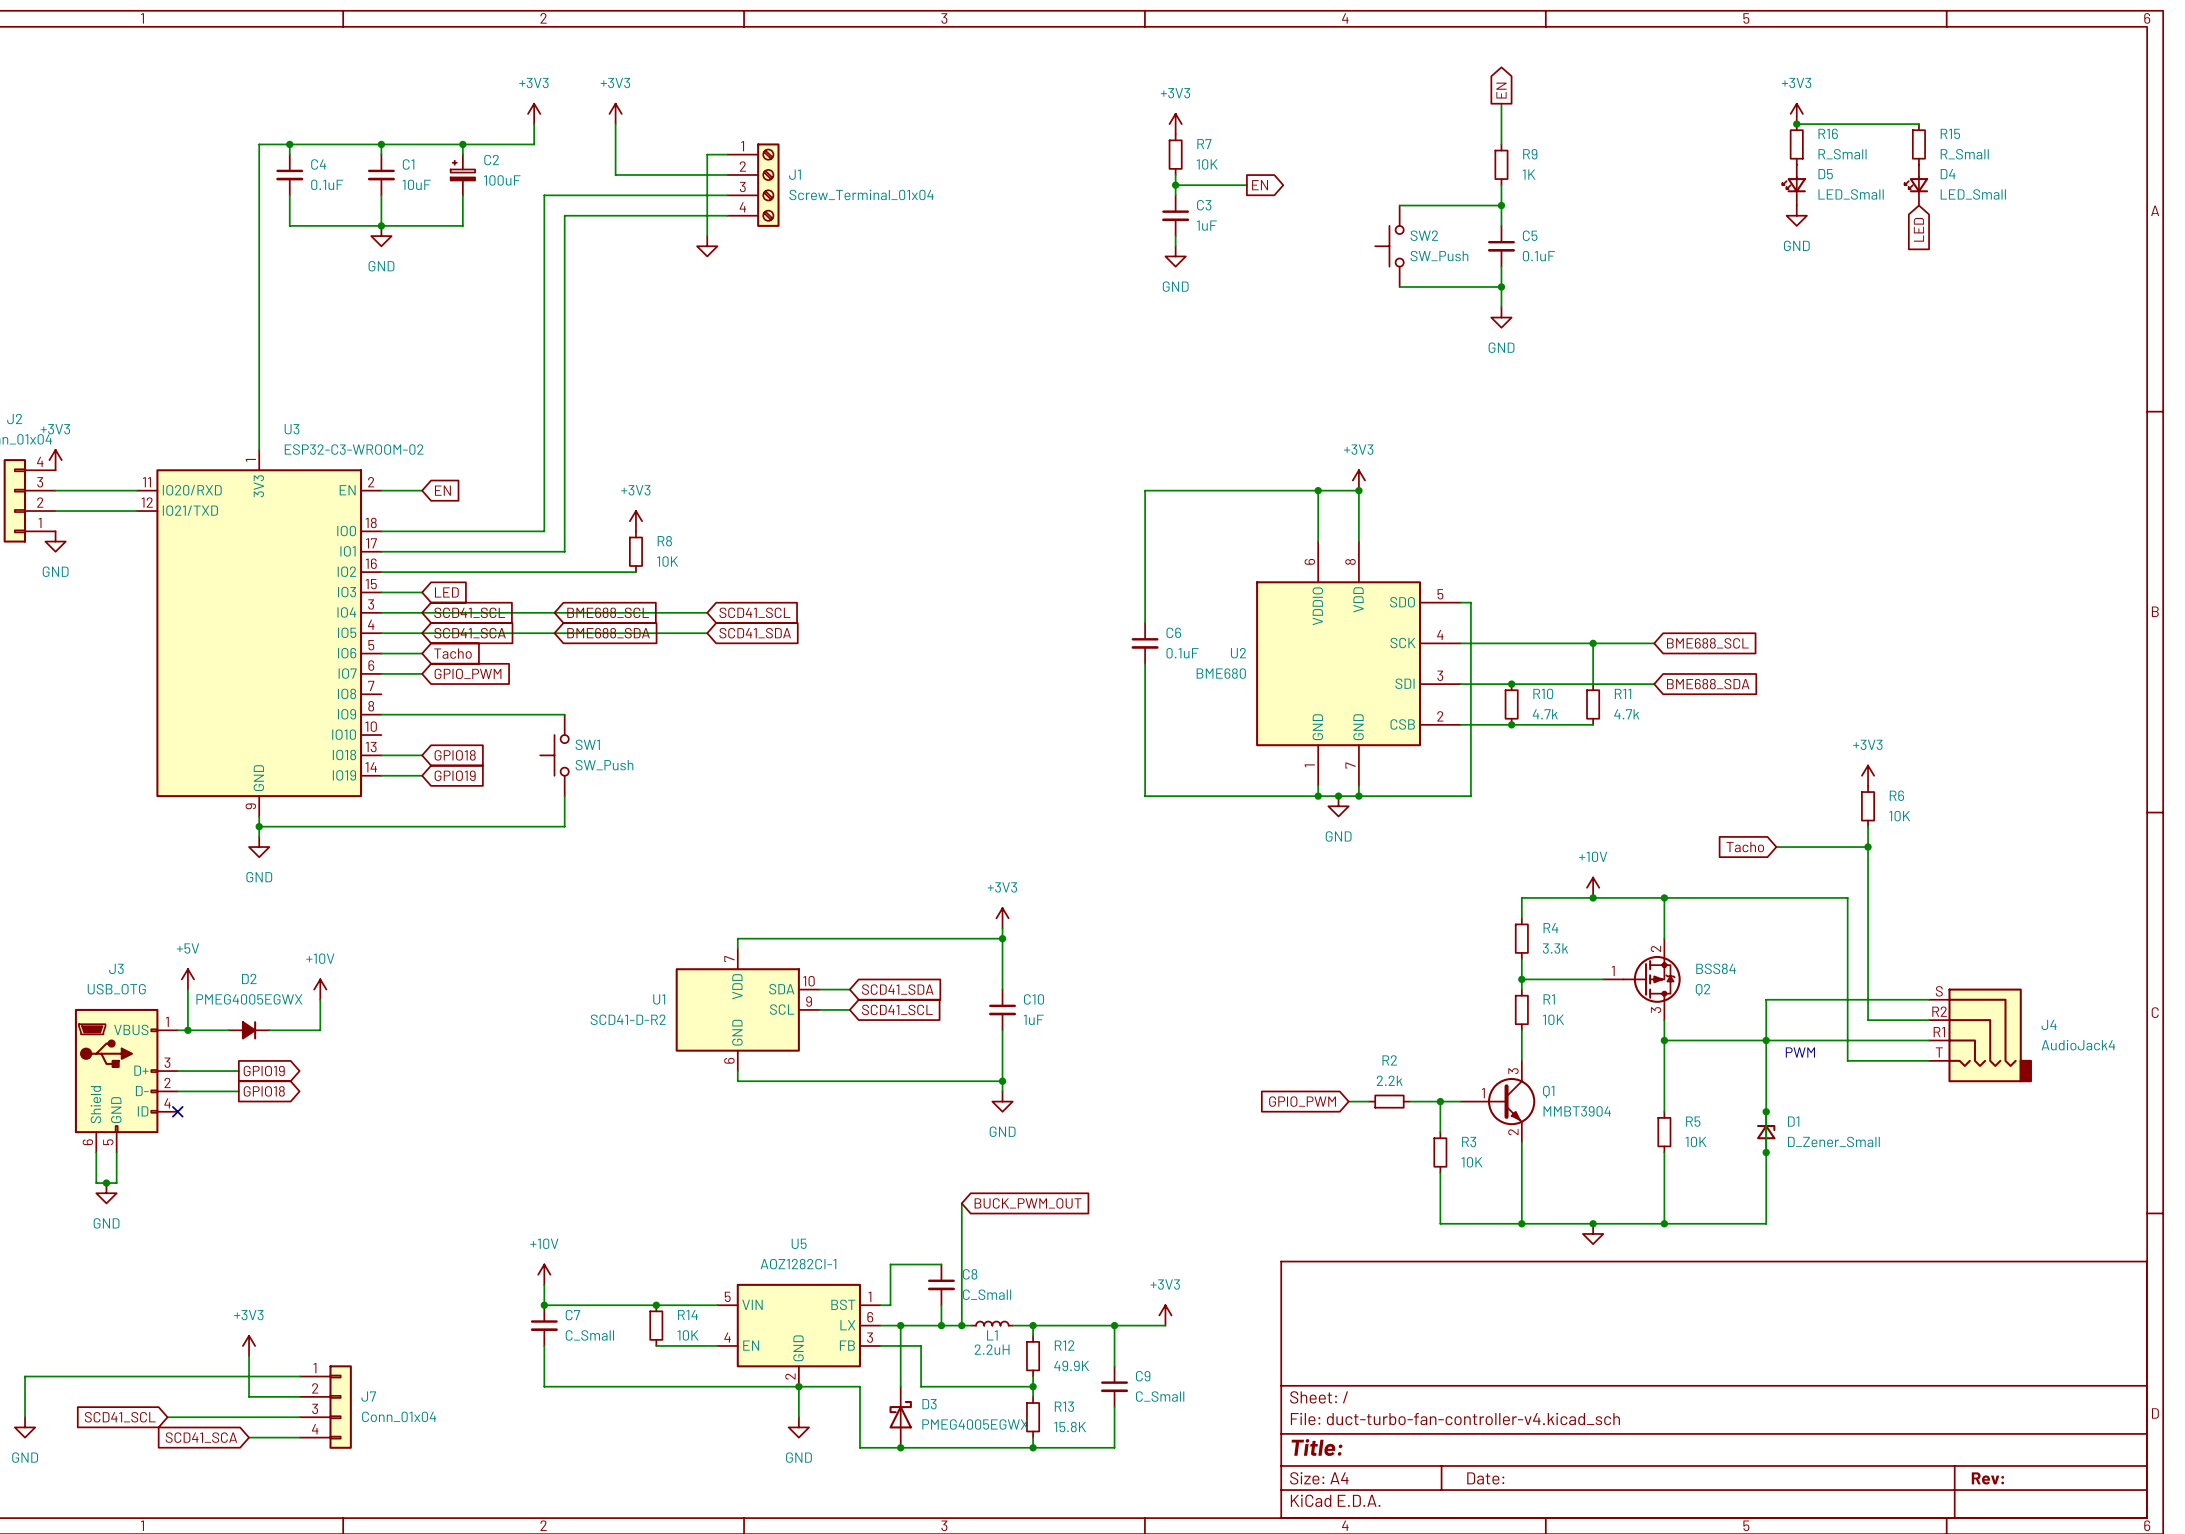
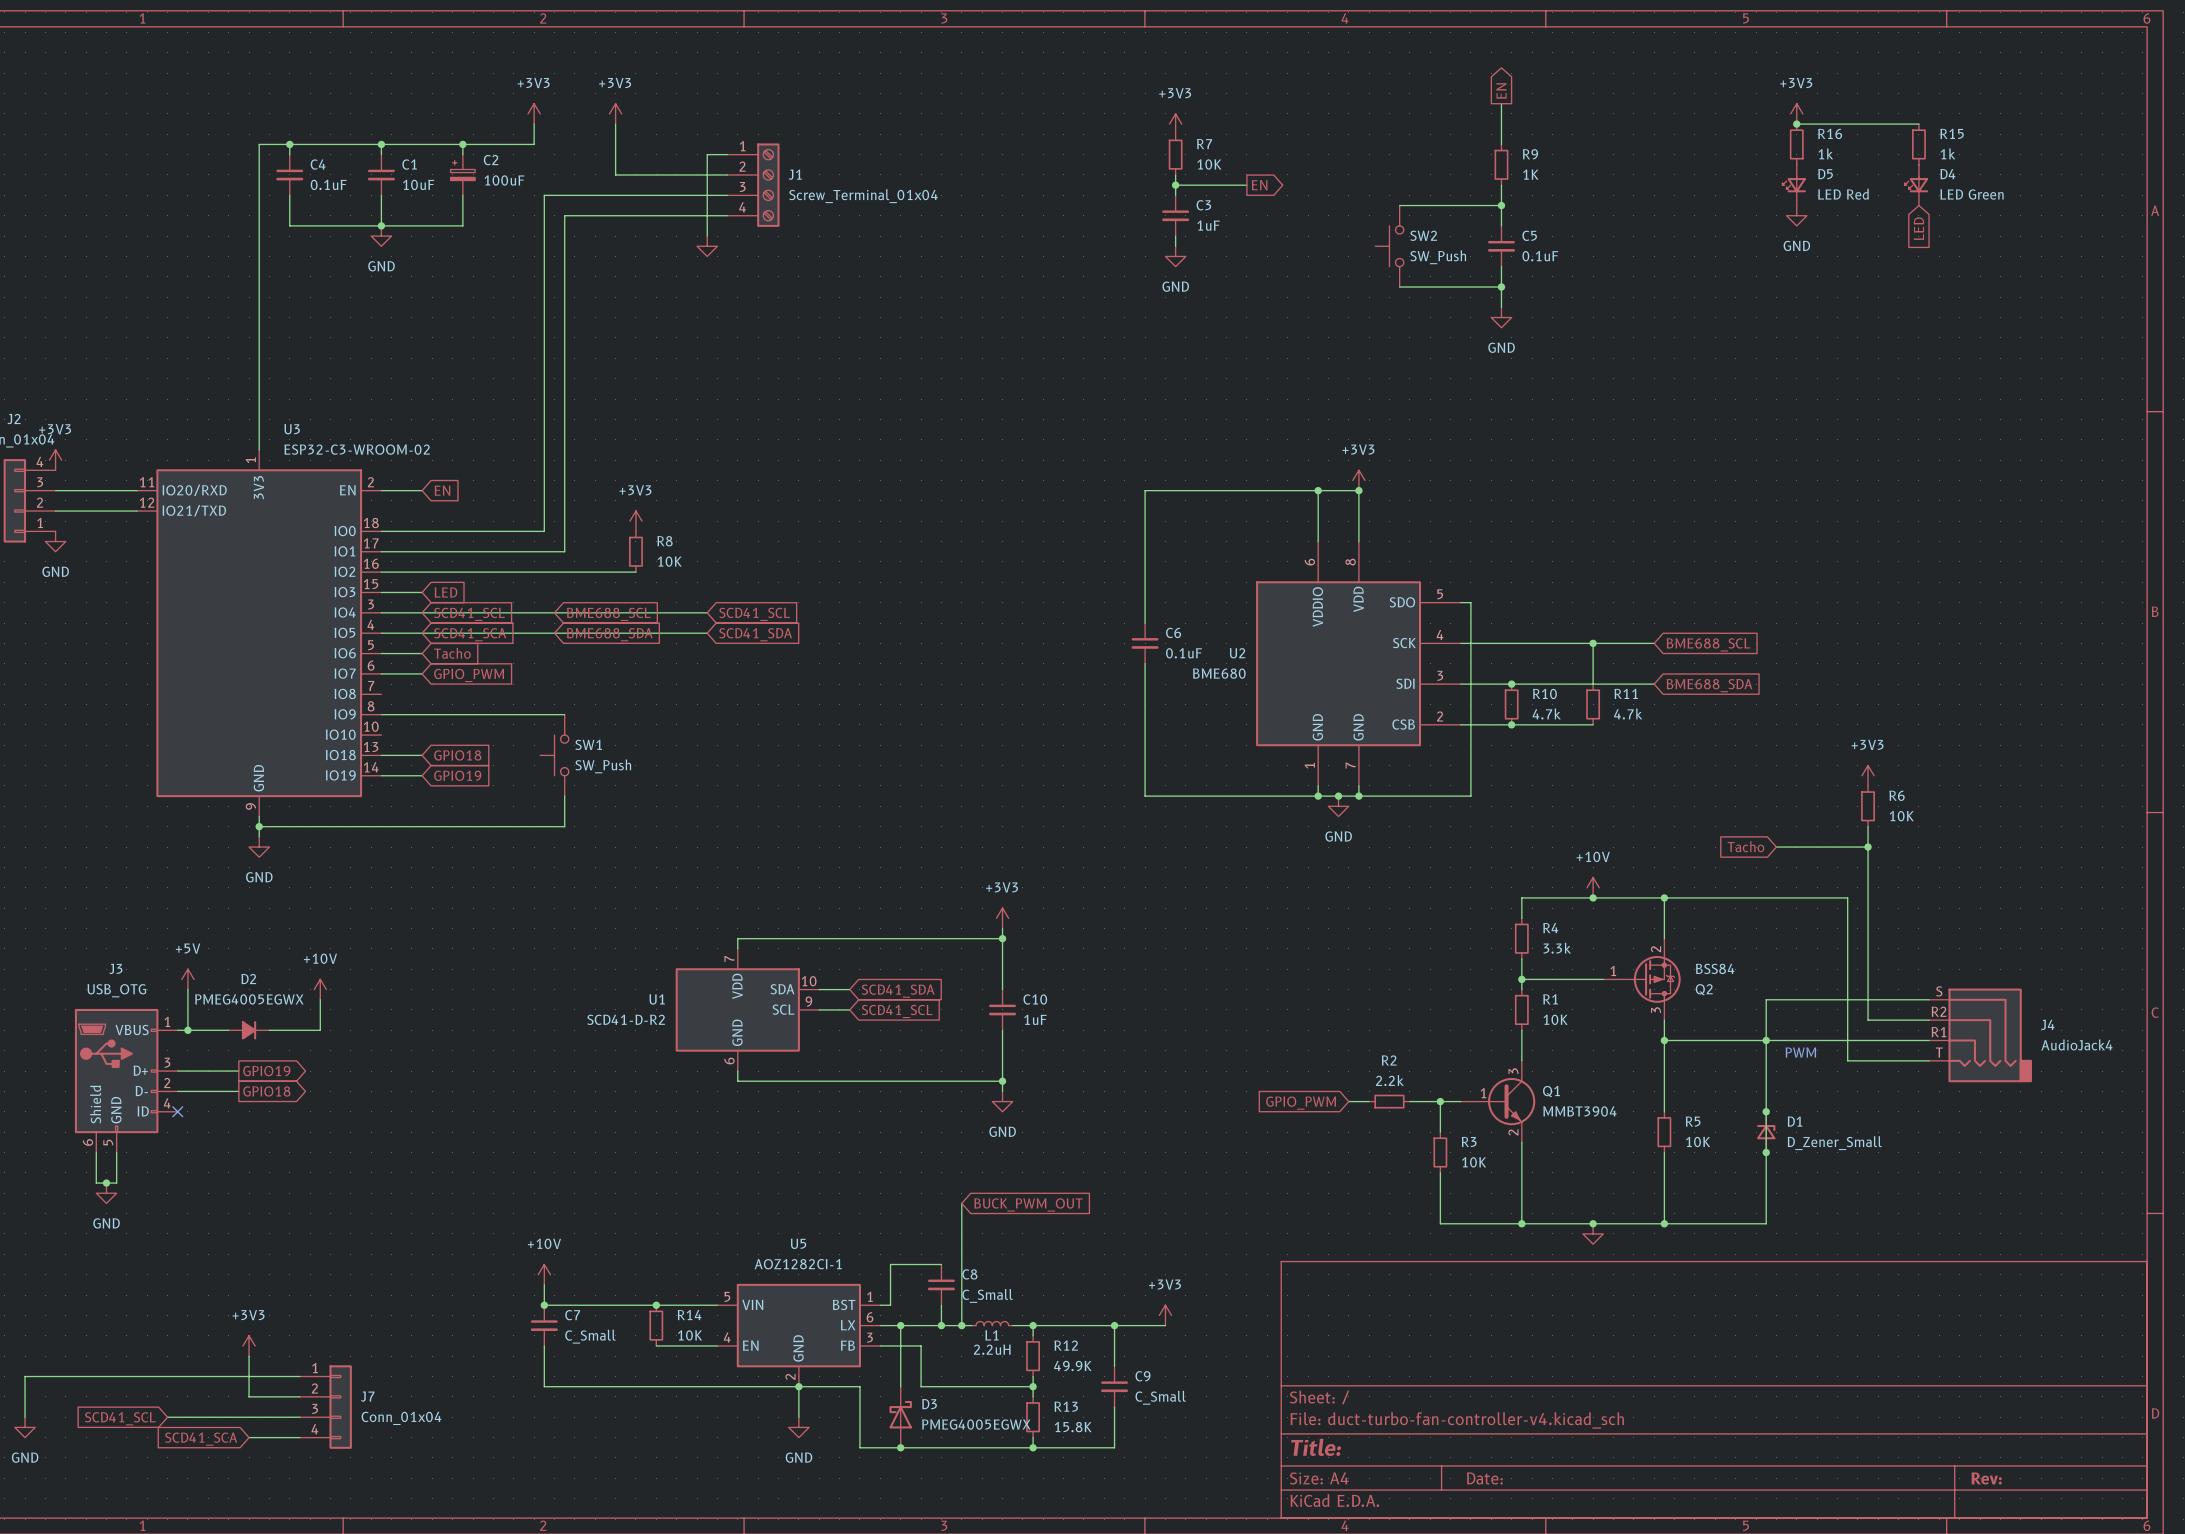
R16 value: R_Small (1842, 154) -> 1k (1825, 153)
R15 value: R_Small (1964, 154) -> 1k (1948, 153)
D5 value: LED_Small (1851, 194) -> LED Red (1843, 194)
D4 value: LED_Small (1973, 194) -> LED Green (1972, 194)

